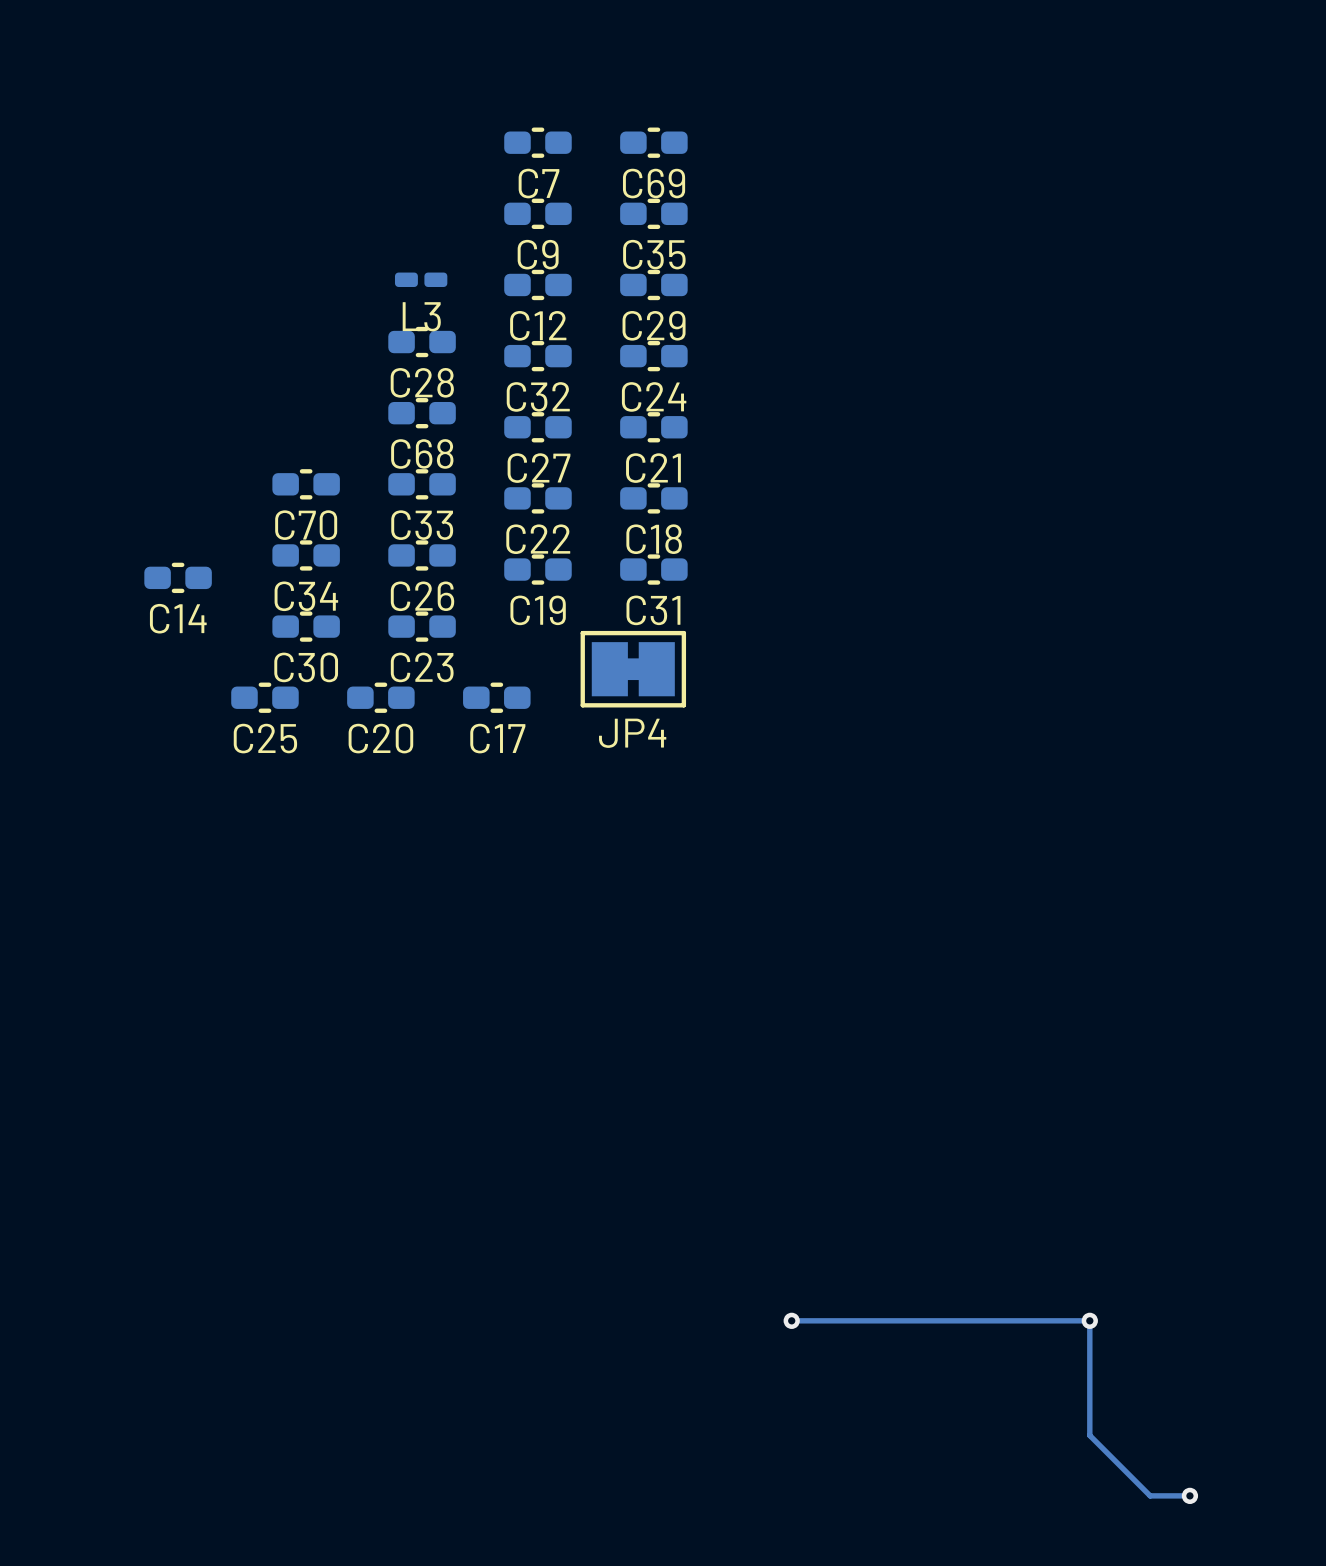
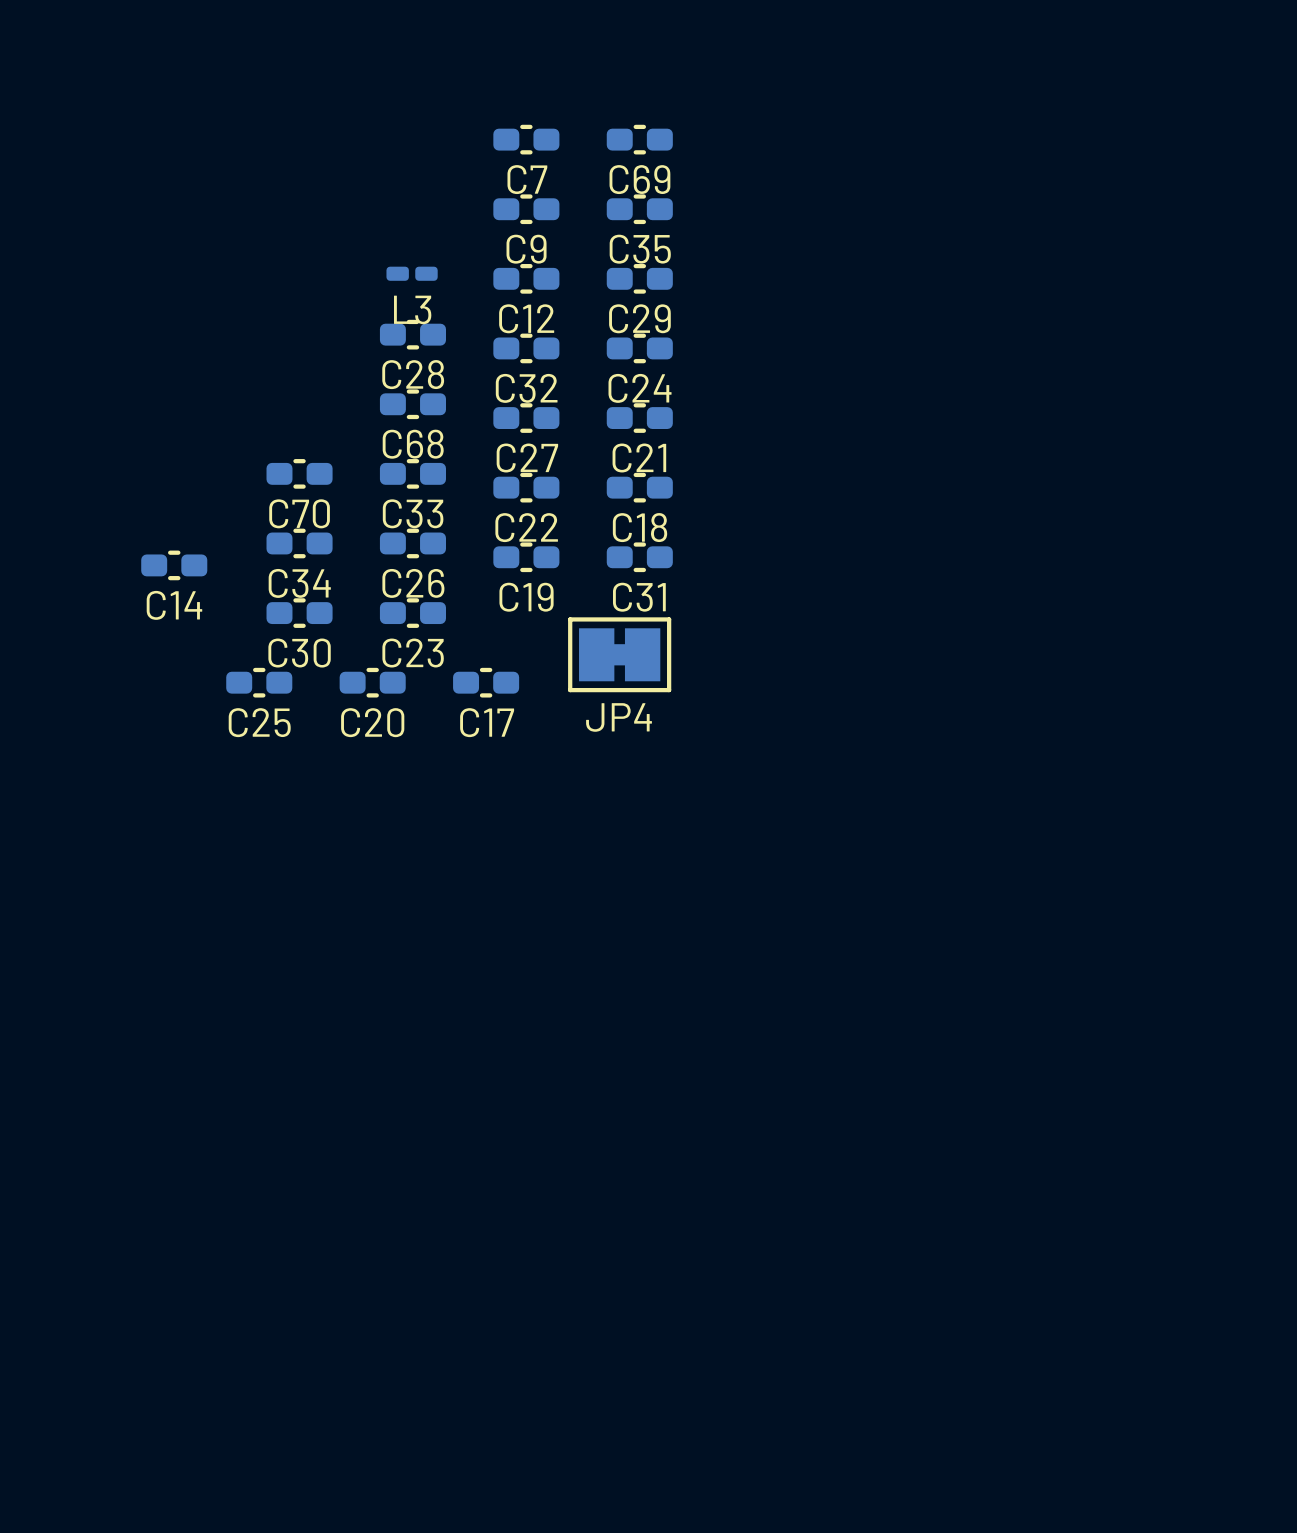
track: (791, 1320) (1089, 1320) (1089, 1435) (1150, 1495) (1189, 1495) -> none
via: (791, 1320) -> none
via: (1089, 1320) -> none
via: (1189, 1495) -> none

